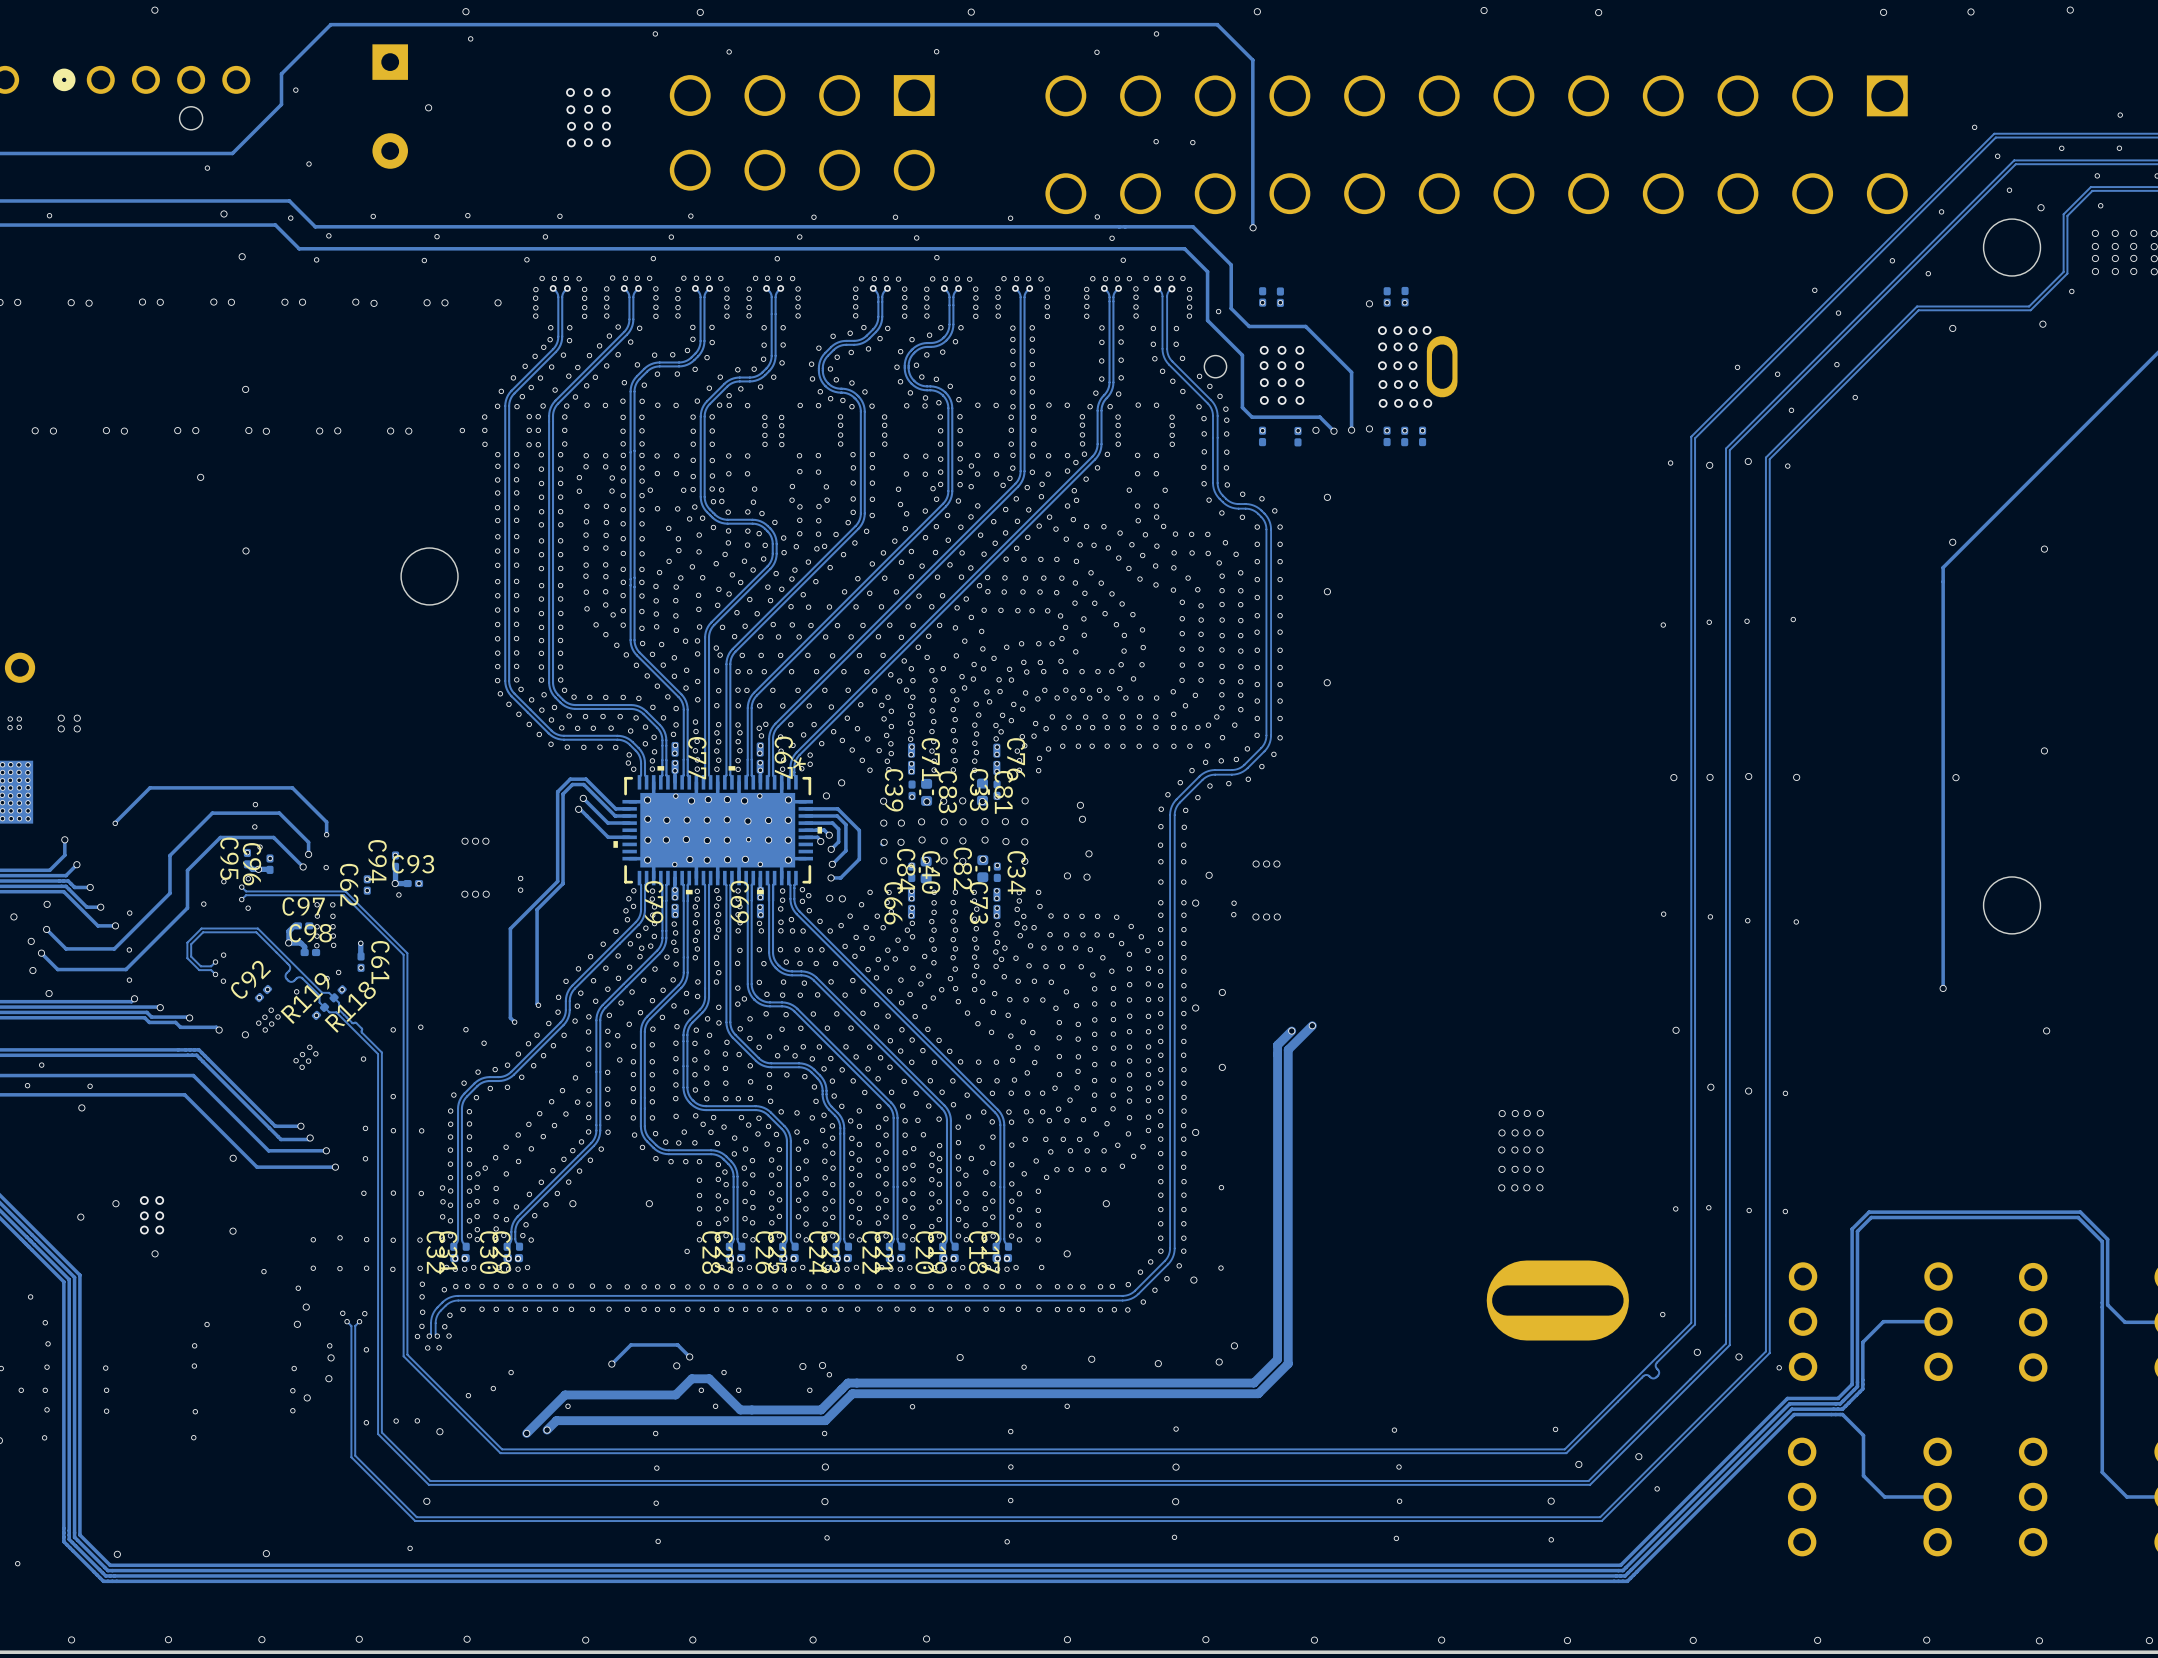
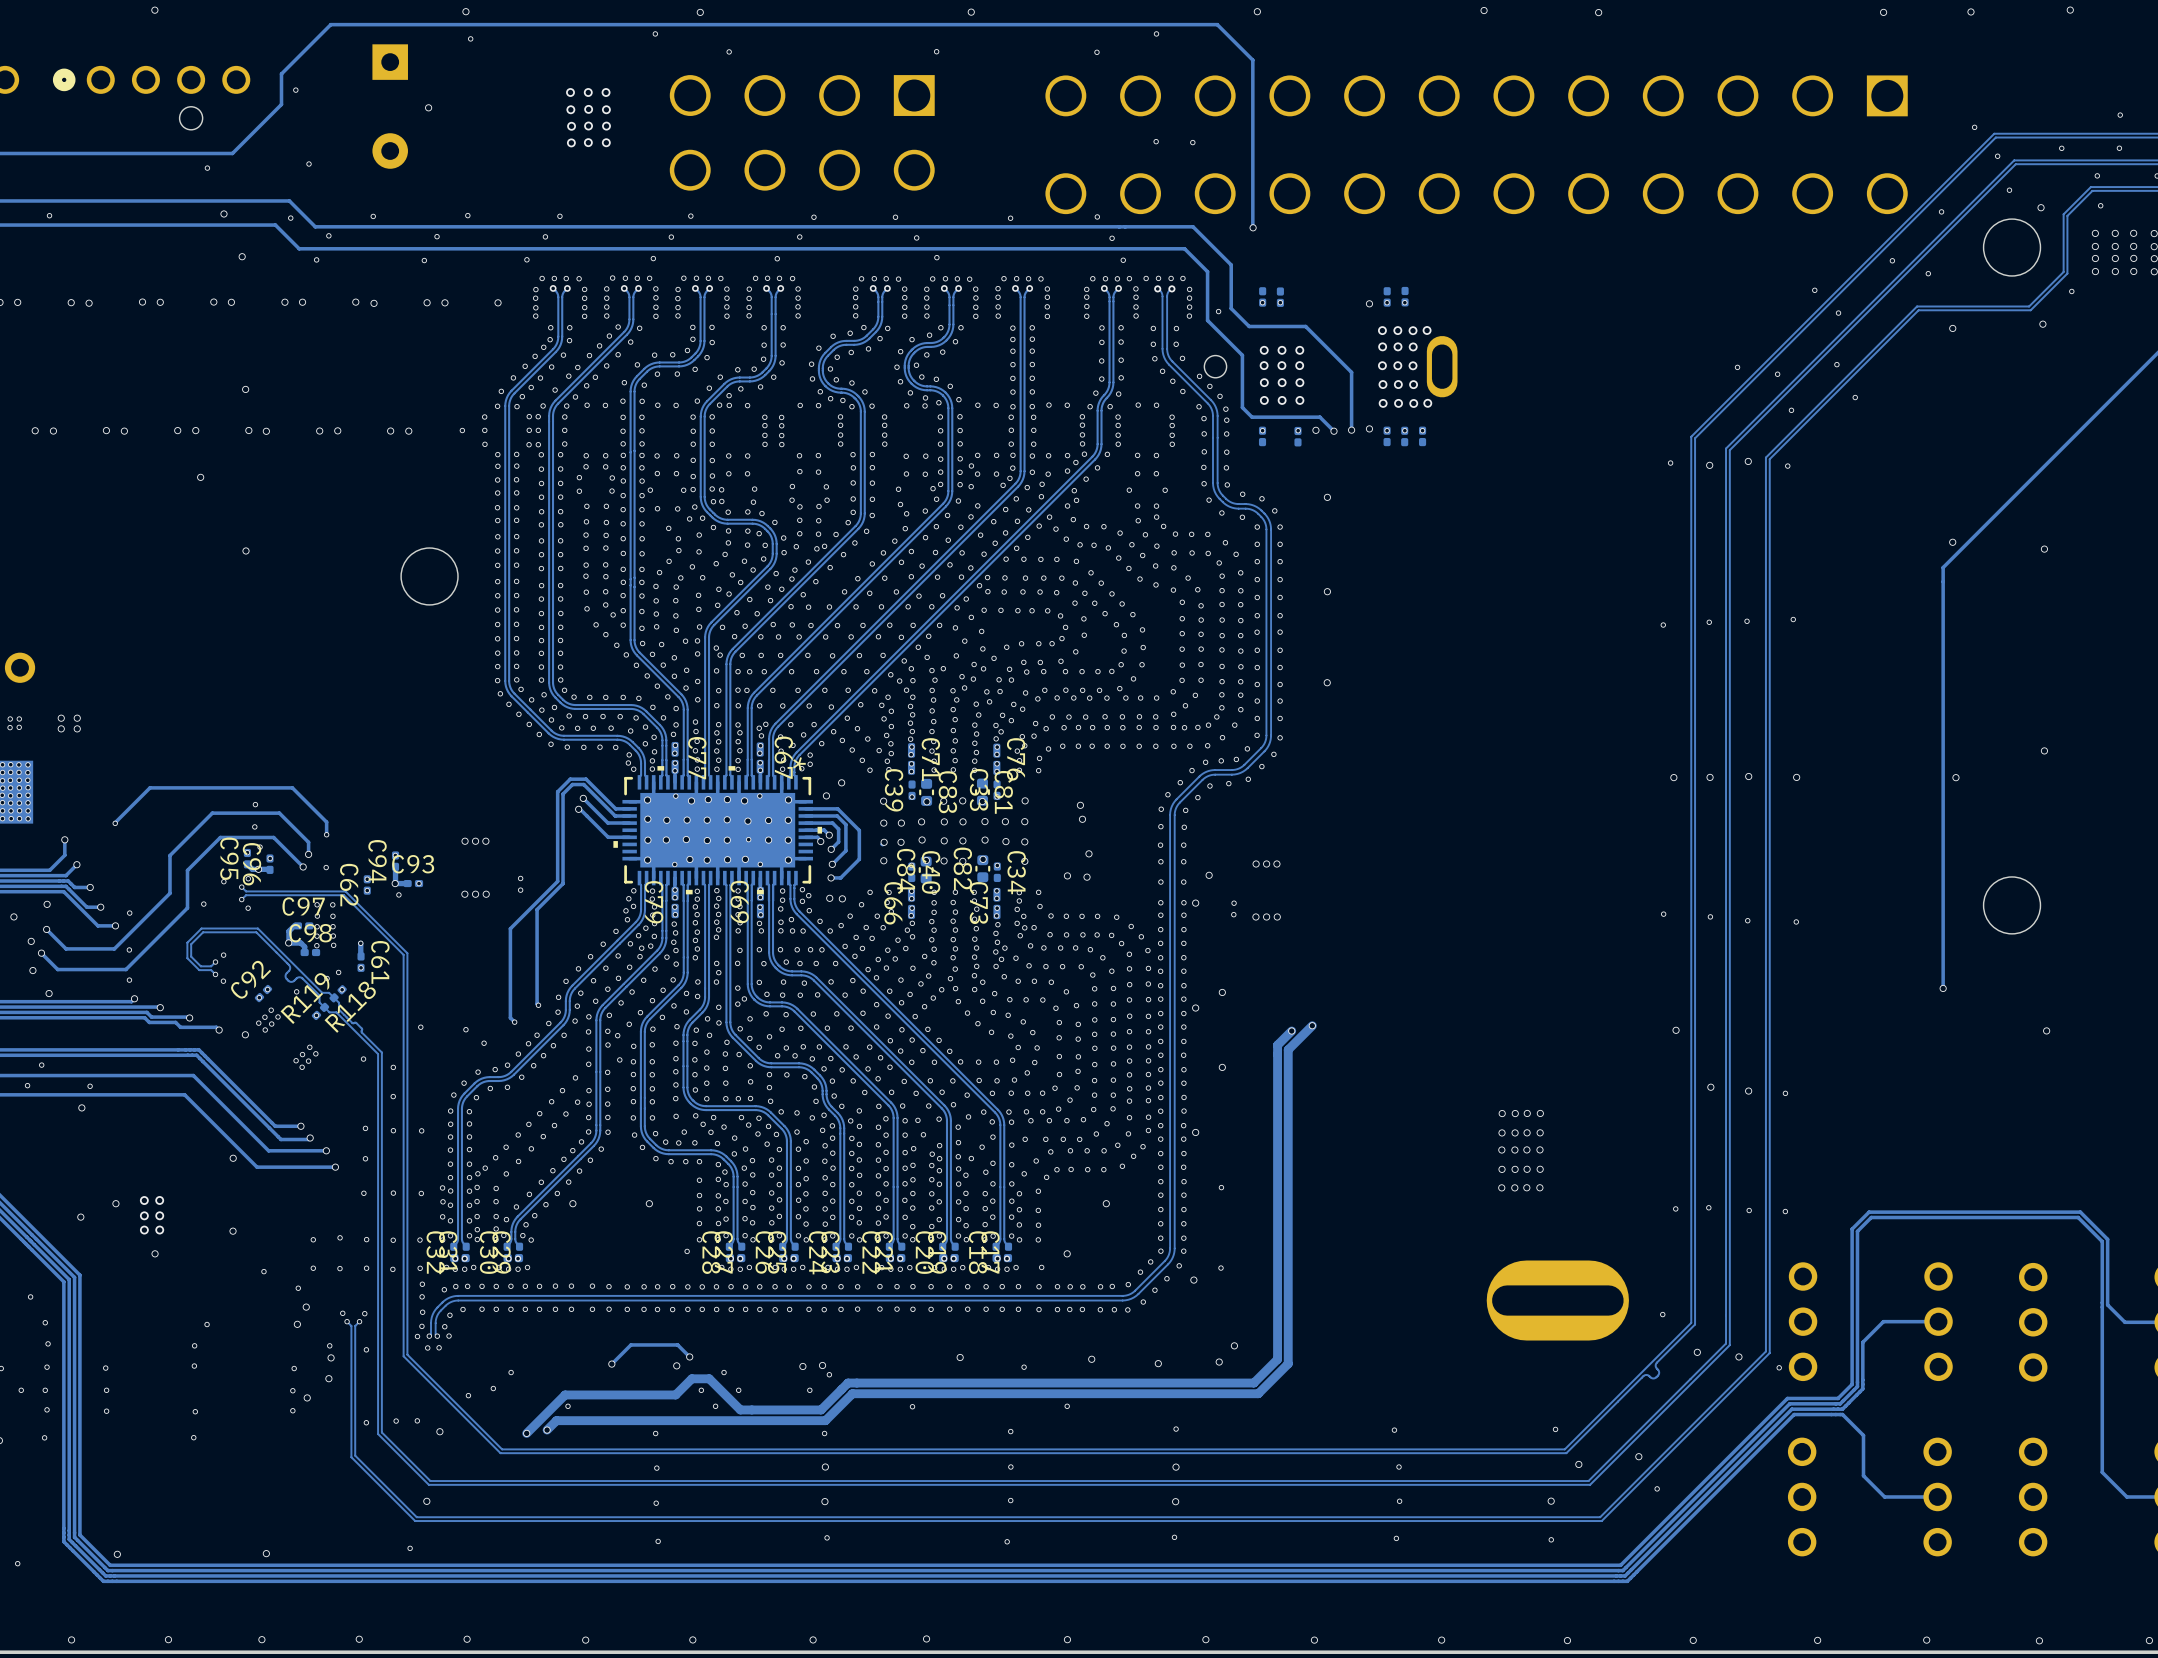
via position: (393, 1029) -> (393, 1067)

